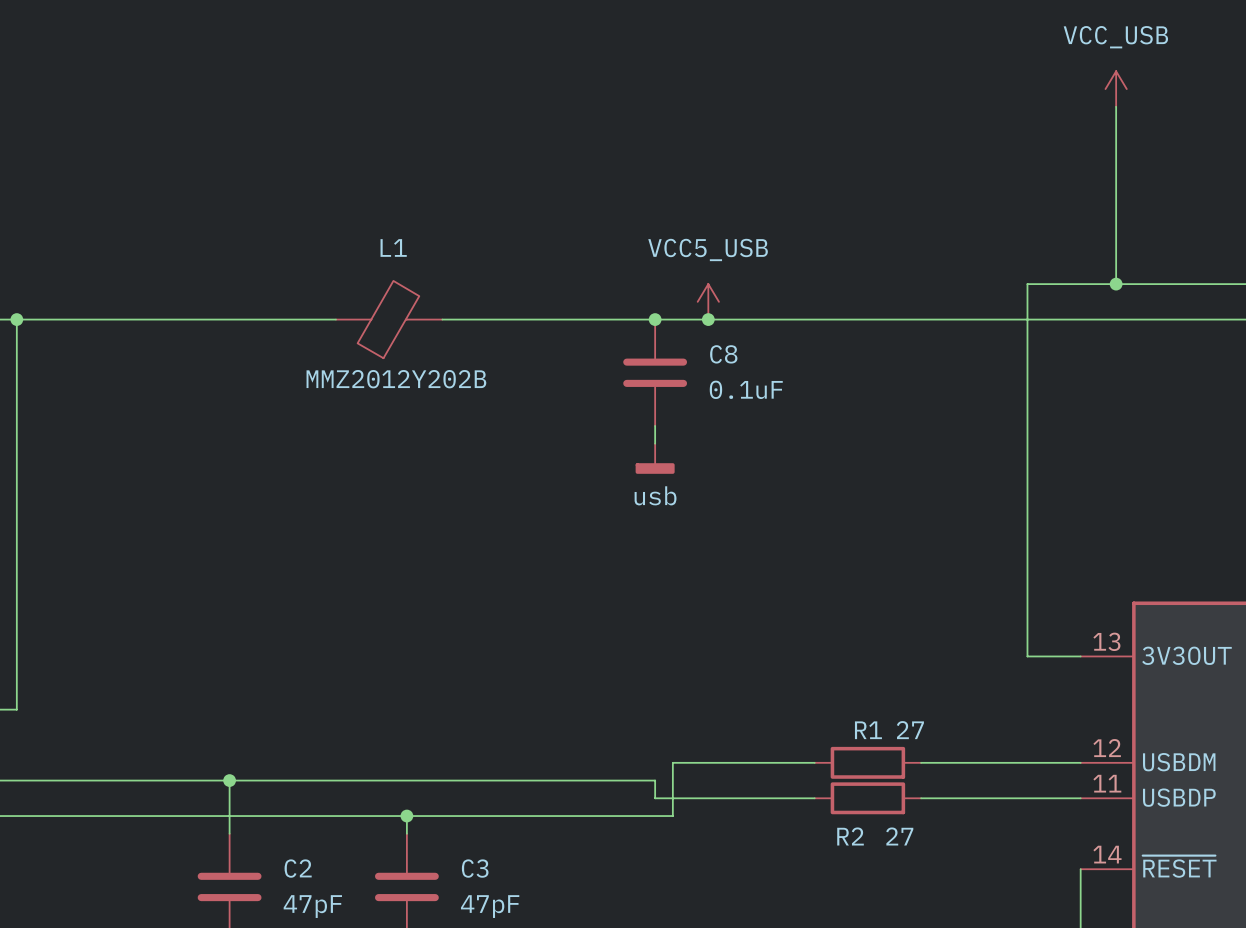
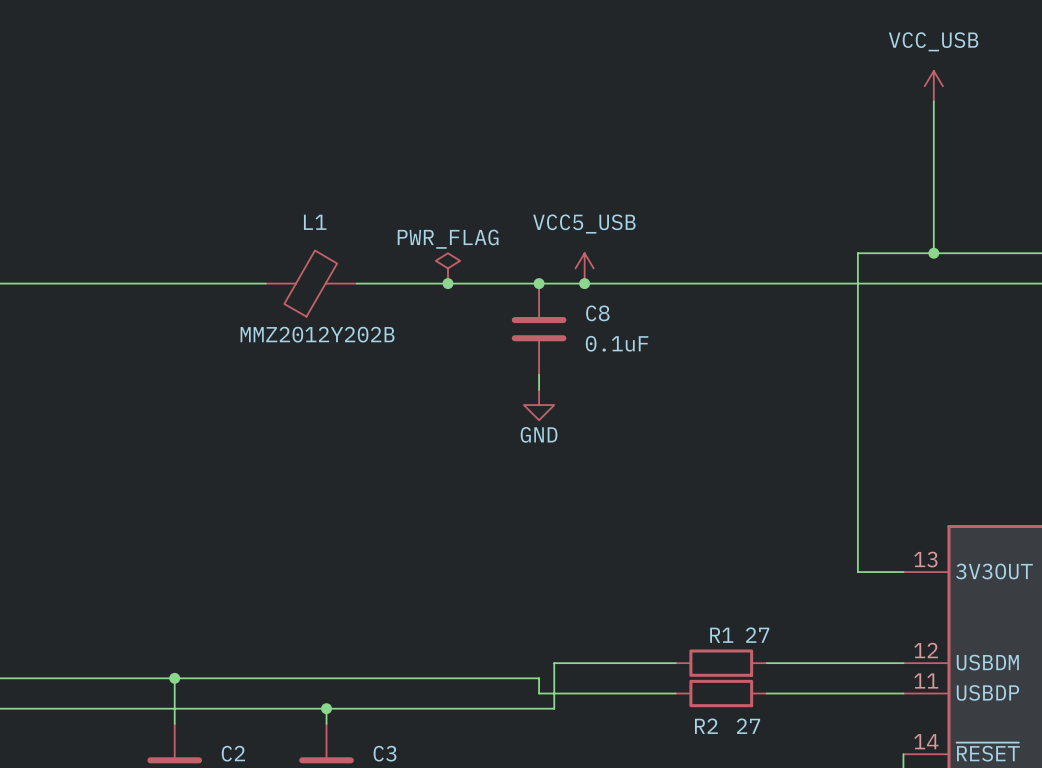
power symbol: none -> PWR_FLAG (447, 268)
junction: none -> (447, 283)
power symbol: usb (655, 458) -> GND (539, 405)

